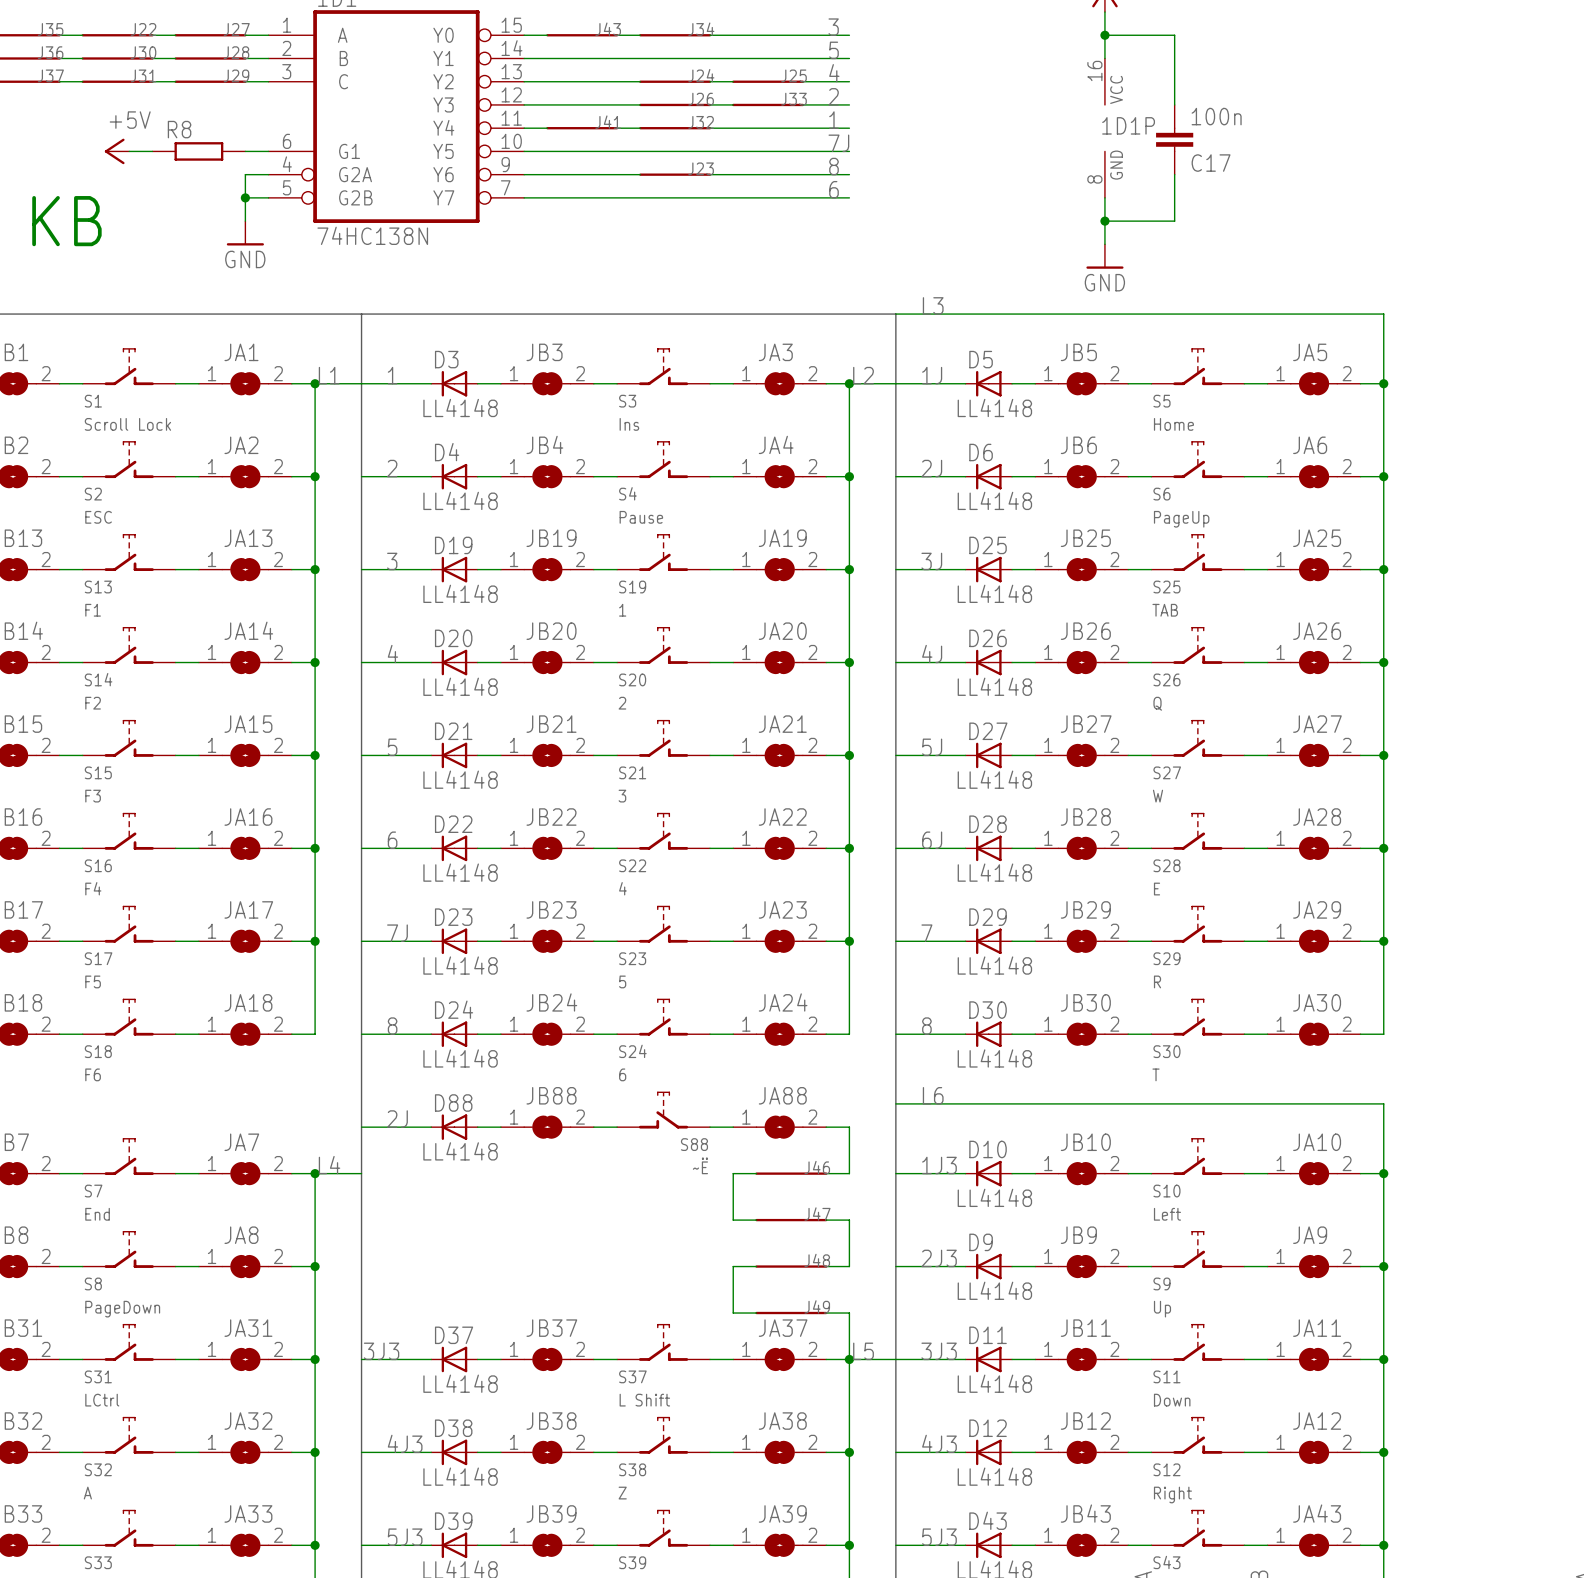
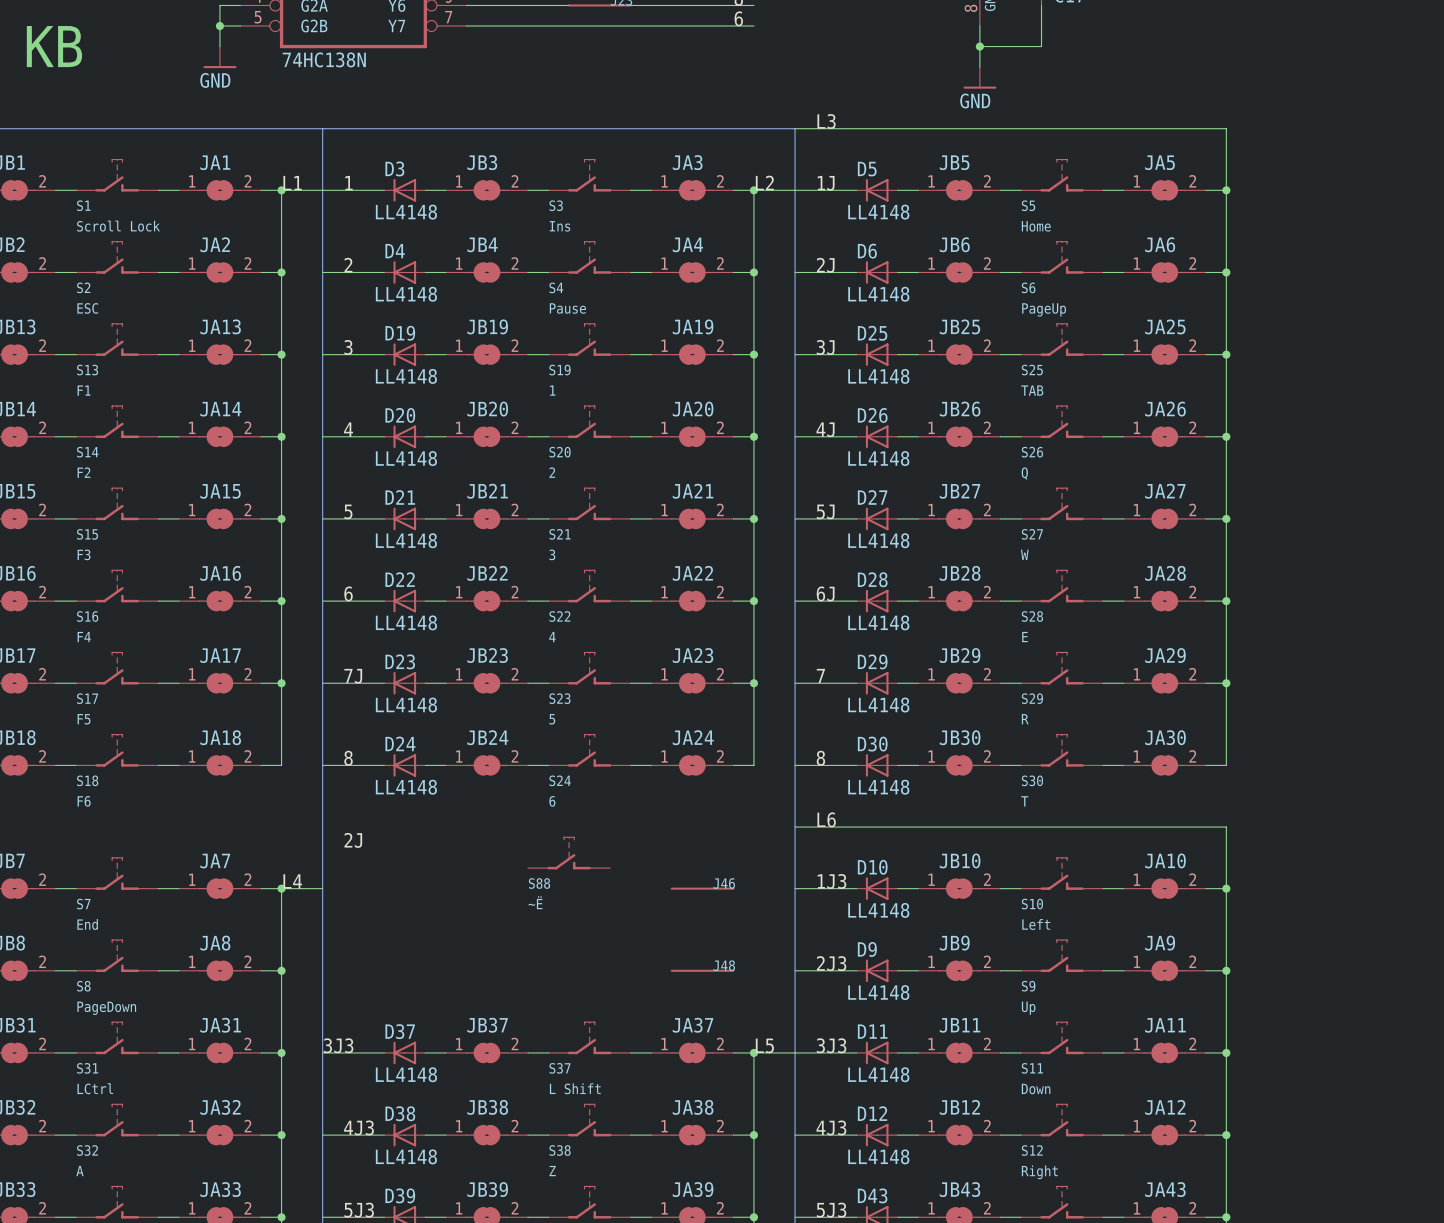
S88 flip: as is (663, 1110) -> left-right (569, 853)
wire: (361, 1127) (431, 1127) -> none
D88: LL4148 (454, 1127) -> none
wire: (477, 1127) (500, 1127) -> none
JB88: (547, 1127) -> none
wire: (593, 1127) (617, 1127) -> none
wire: (710, 1127) (733, 1127) -> none
JA88: (779, 1127) -> none
wire: (826, 1127) (849, 1127) (849, 1173) (826, 1173) -> none
wire: (756, 1173) (733, 1173) (733, 1220) (756, 1220) -> none
J47: (791, 1220) -> none
wire: (826, 1220) (849, 1220) (849, 1266) (826, 1266) -> none
wire: (756, 1266) (733, 1266) (733, 1313) (756, 1313) -> none
J49: (791, 1313) -> none
wire: (826, 1313) (849, 1313) (849, 1359) -> none

